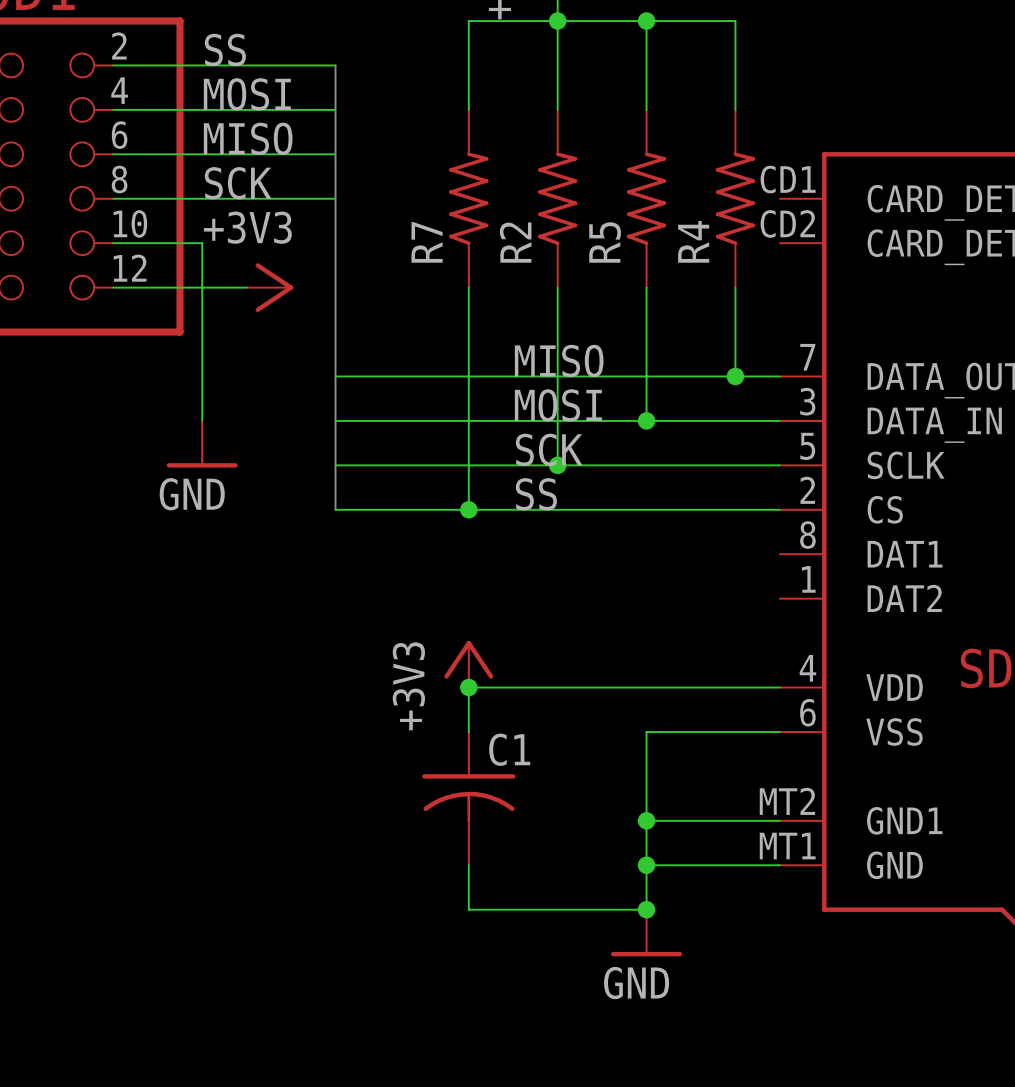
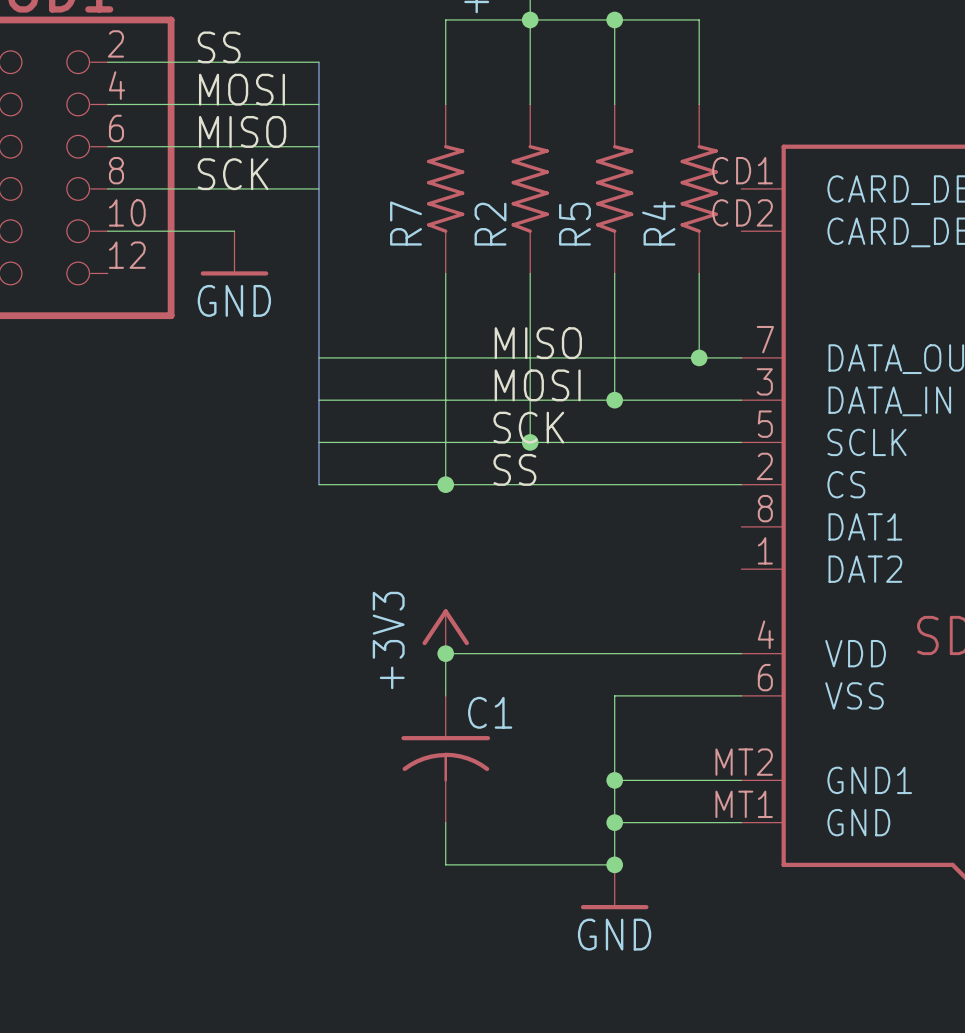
wire: (202, 243) (202, 420) -> (192, 231) (234, 231)
wire: (113, 287) (246, 287) -> none
power symbol: +3V3 (269, 287) -> none
power symbol position: GND (202, 444) -> GND (234, 253)

